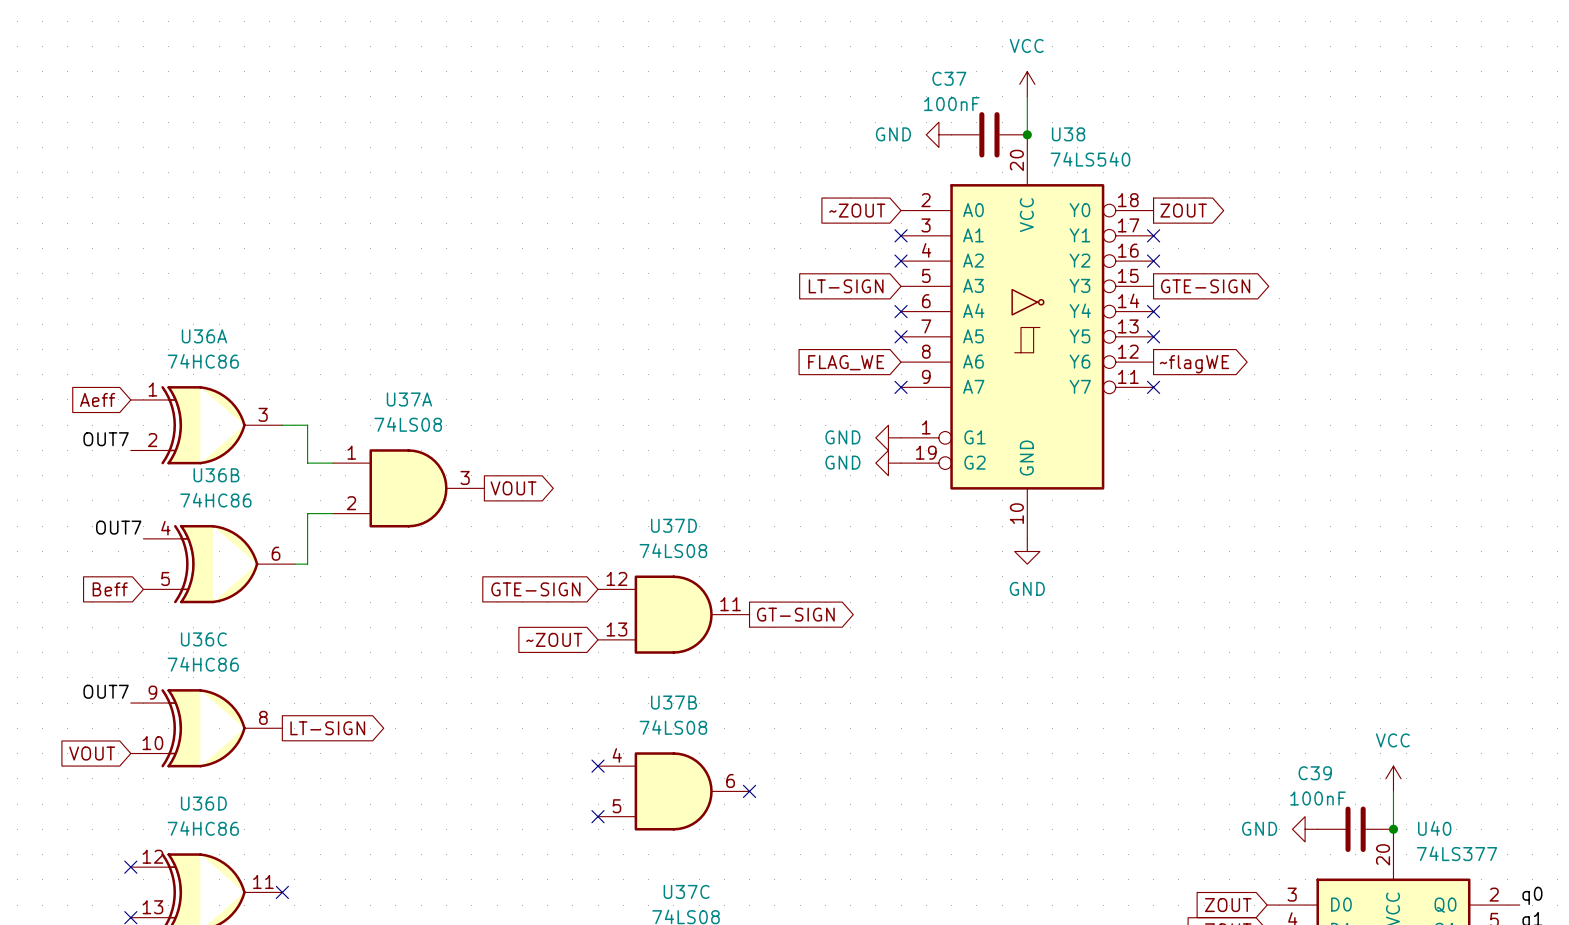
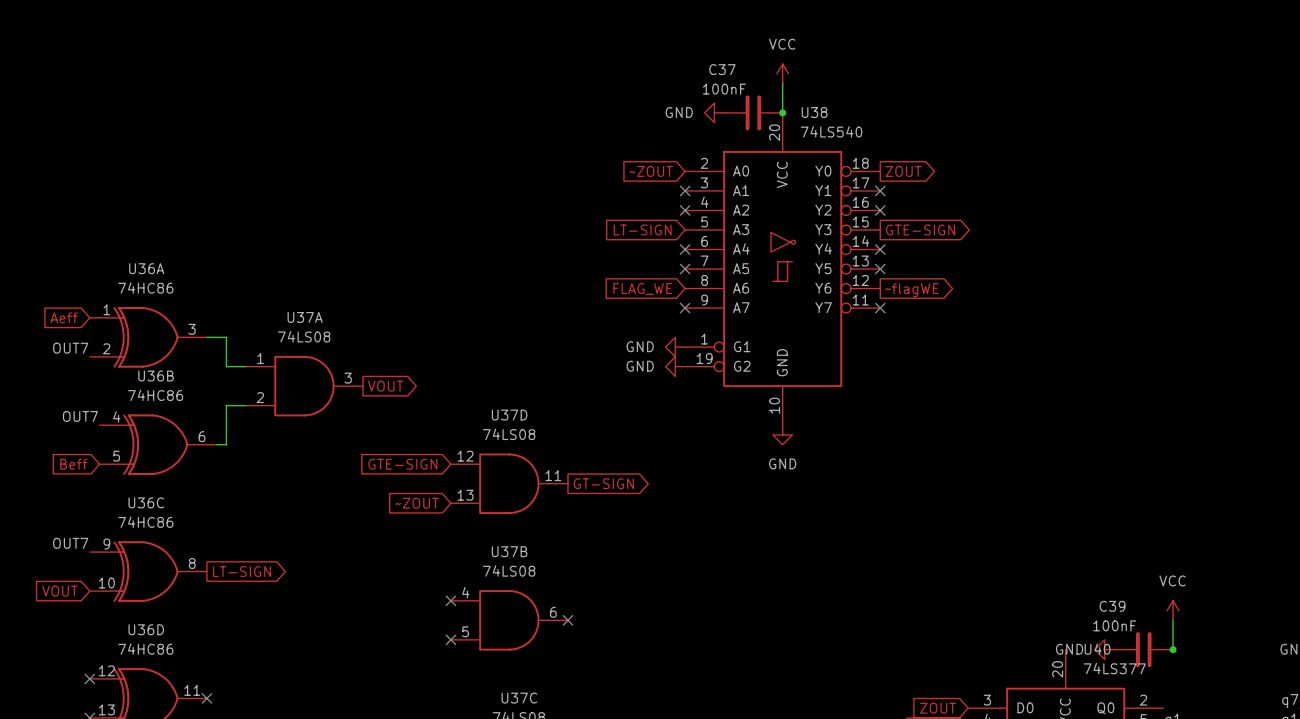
power symbol position: VCC (1393, 778) -> VCC (1173, 610)
wire: (1393, 791) (1393, 829) -> (1173, 620) (1173, 649)
power symbol position: GND (1305, 829) -> GND (1104, 649)
C39 position: (1355, 829) -> (1143, 649)
junction: (1393, 829) -> none
junction: none -> (1173, 649)
label: q0 (1532, 895) -> none

